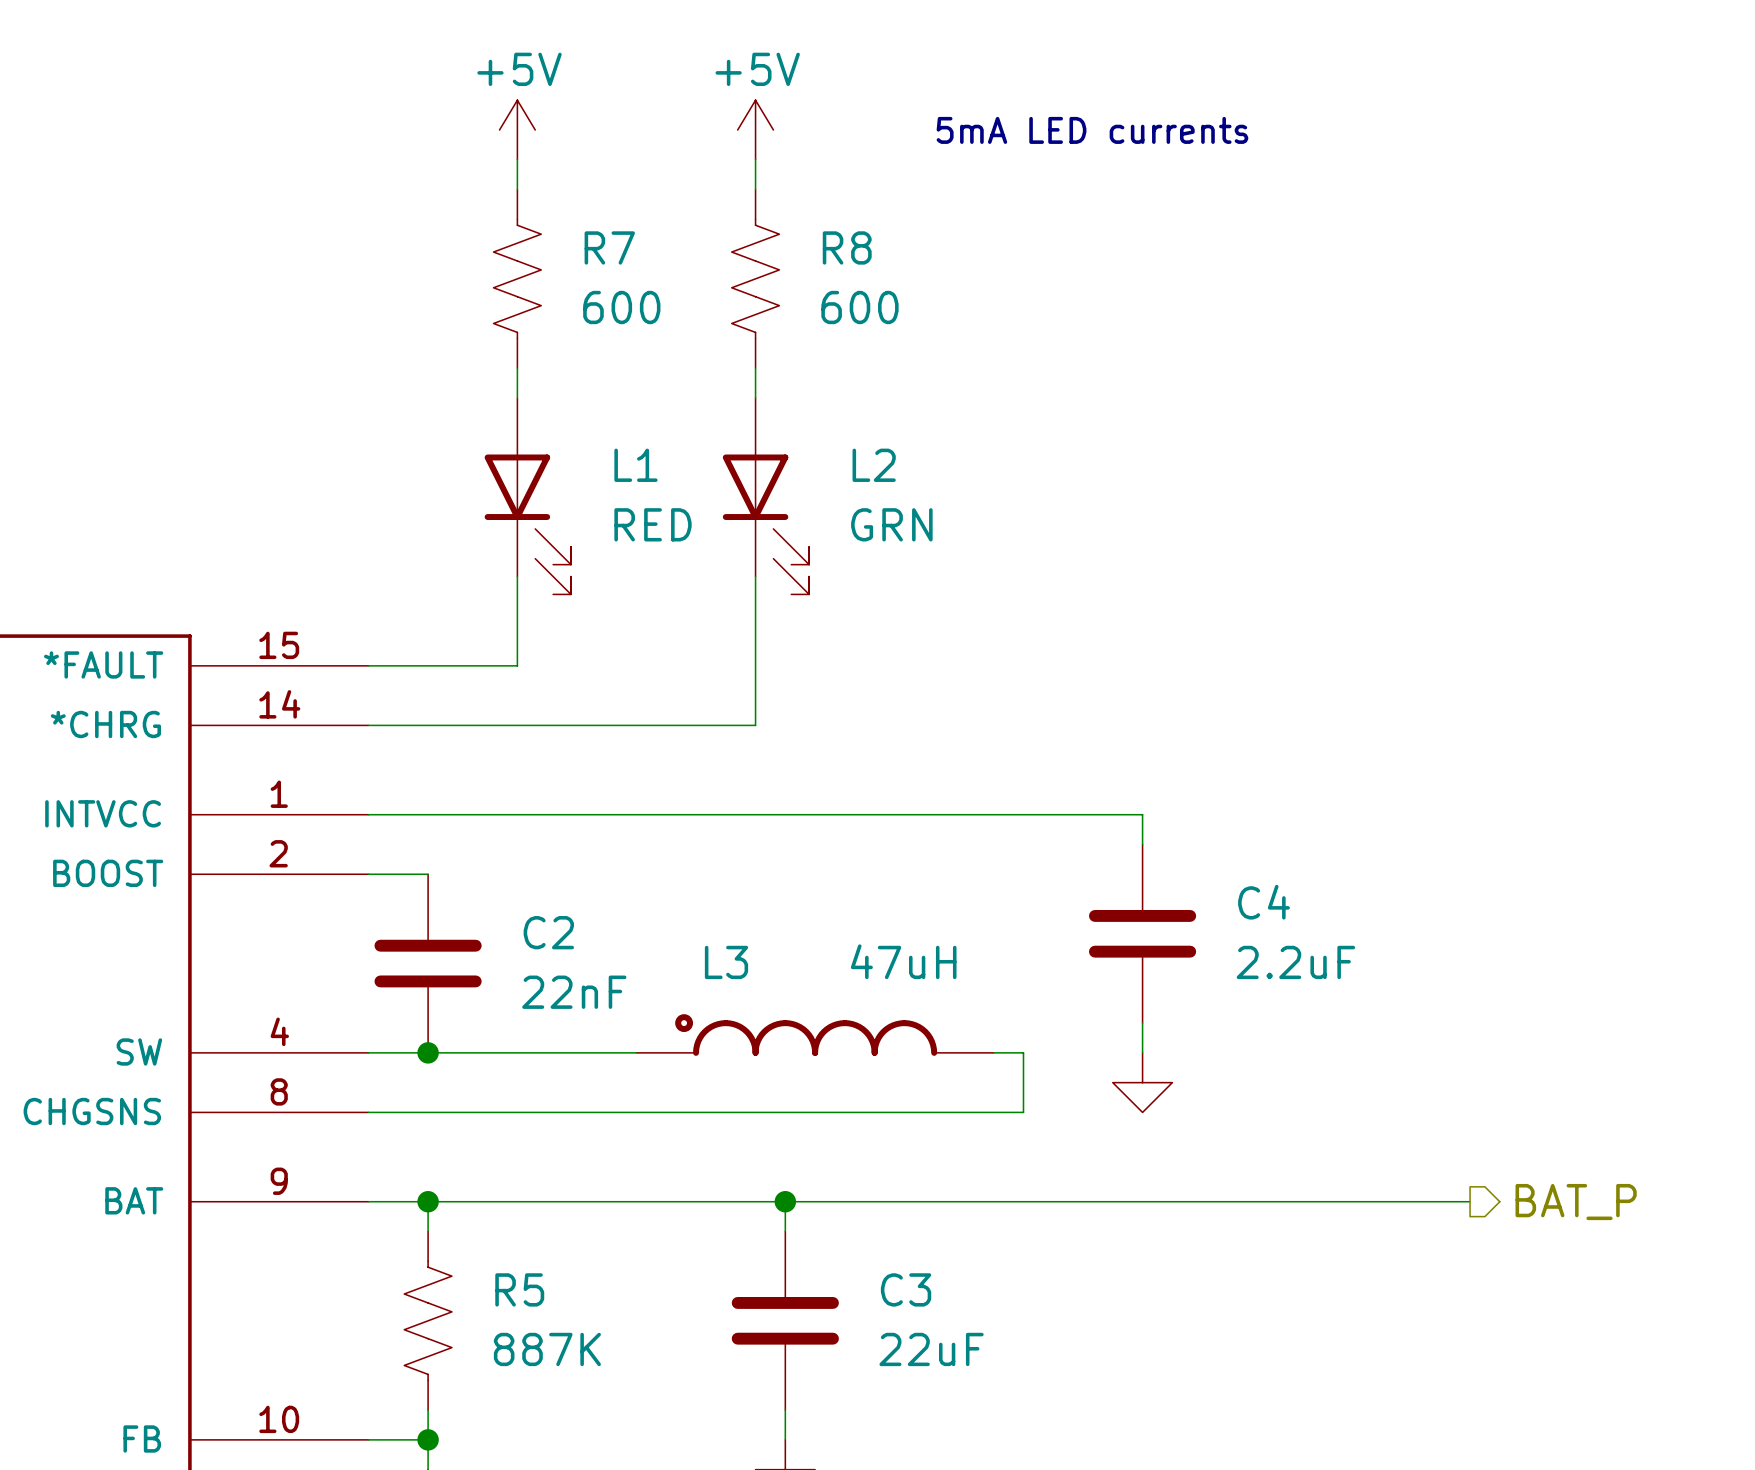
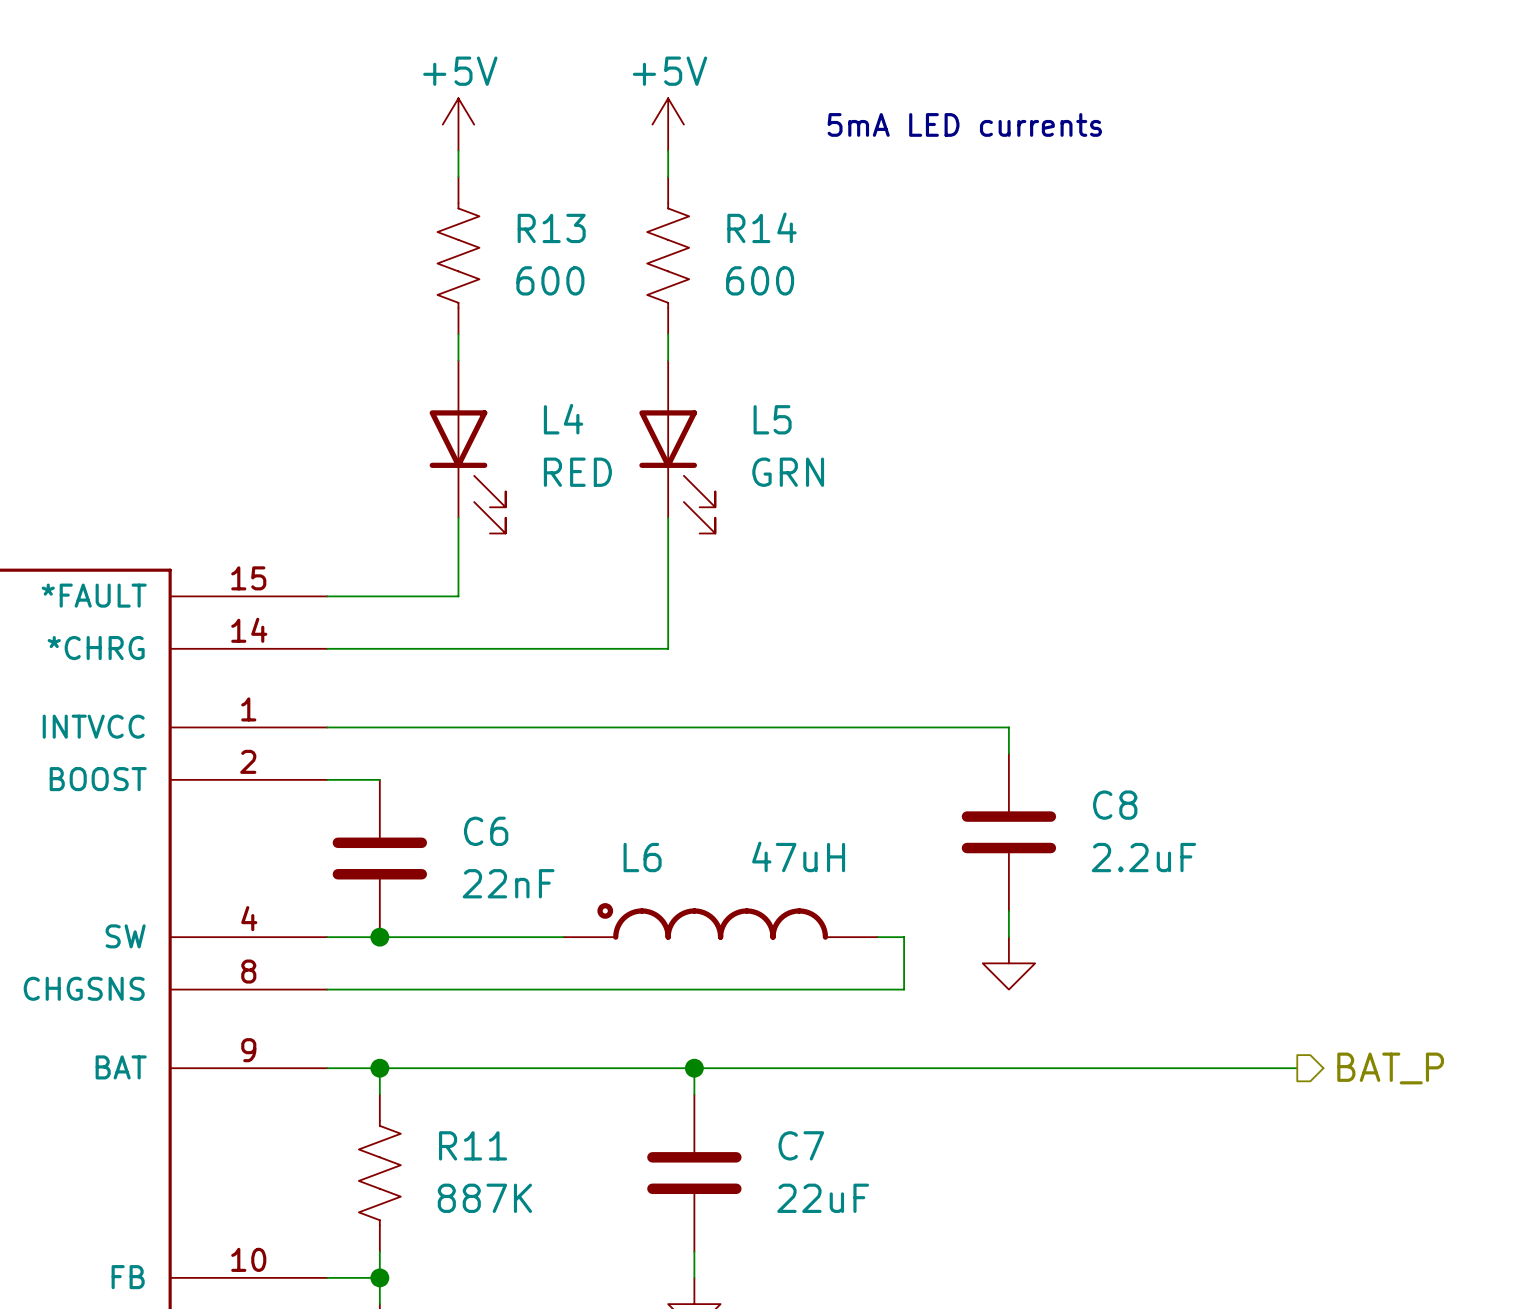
R7 name: R7 (609, 247) -> R13 (551, 228)
R8 name: R8 (847, 247) -> R14 (761, 227)
L1 name: L1 (635, 465) -> L4 (563, 419)
L2 name: L2 (874, 465) -> L5 (772, 419)
C4 name: C4 (1264, 902) -> C8 (1115, 805)
C2 name: C2 (548, 932) -> C6 (486, 831)
L3 name: L3 (726, 962) -> L6 (642, 857)
R5 name: R5 (519, 1289) -> R11 (473, 1145)
C3 name: C3 (906, 1289) -> C7 (801, 1145)

